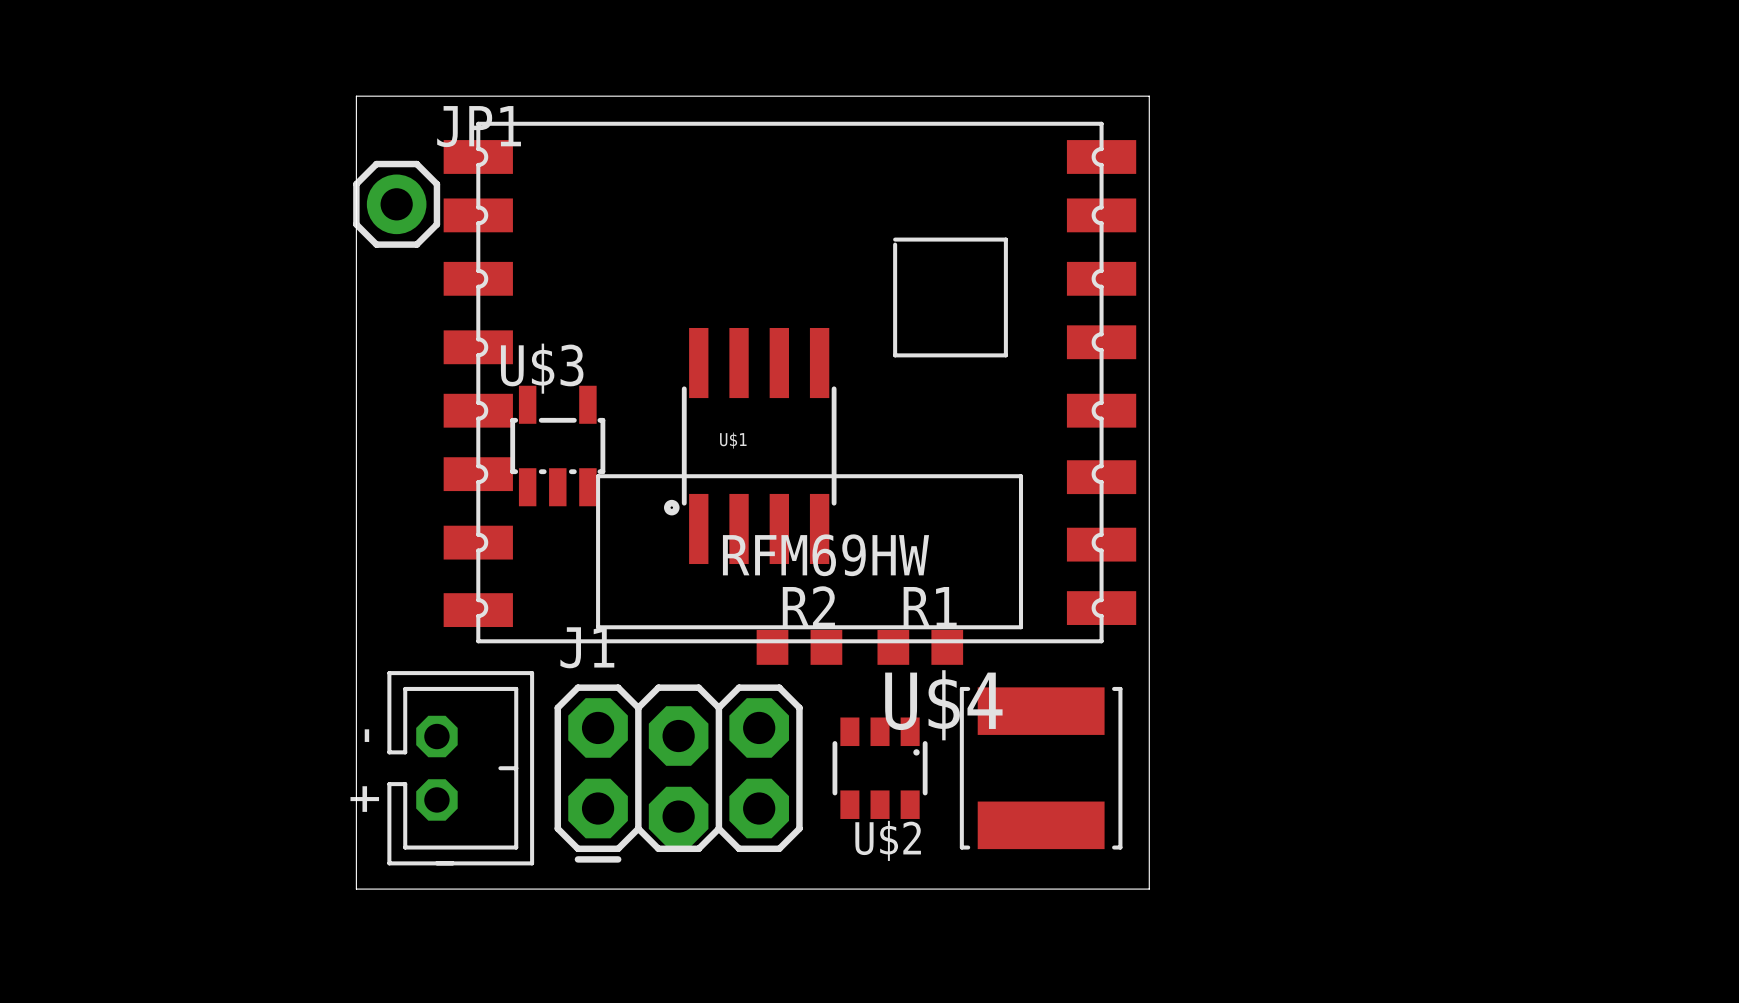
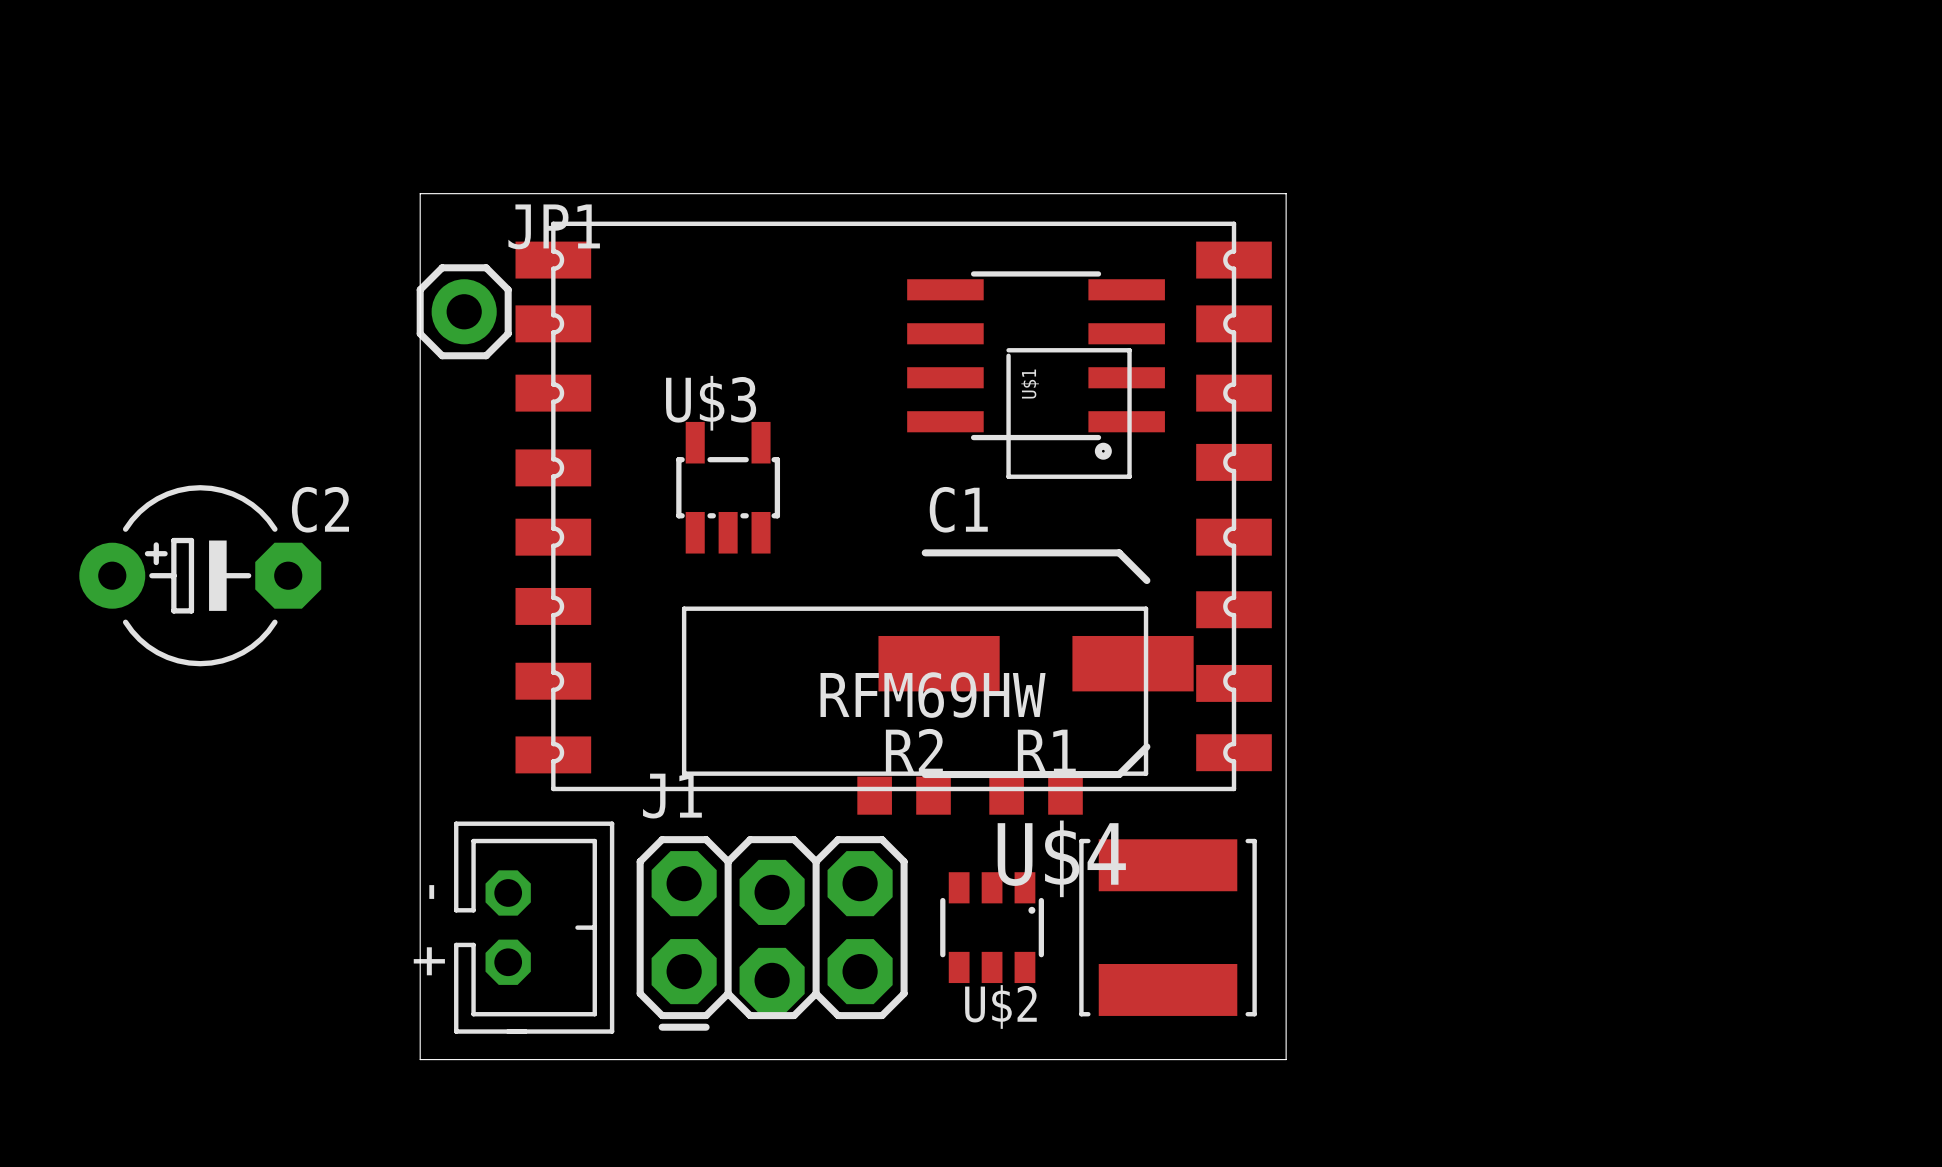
C2: none -> (200, 575)
U$3 position: (557, 446) -> (728, 487)
U$1 rotation: 0° (750, 446) -> 90° counterclockwise (1036, 365)
U$1 position: (750, 446) -> (1036, 365)
C1: none -> (1036, 663)

